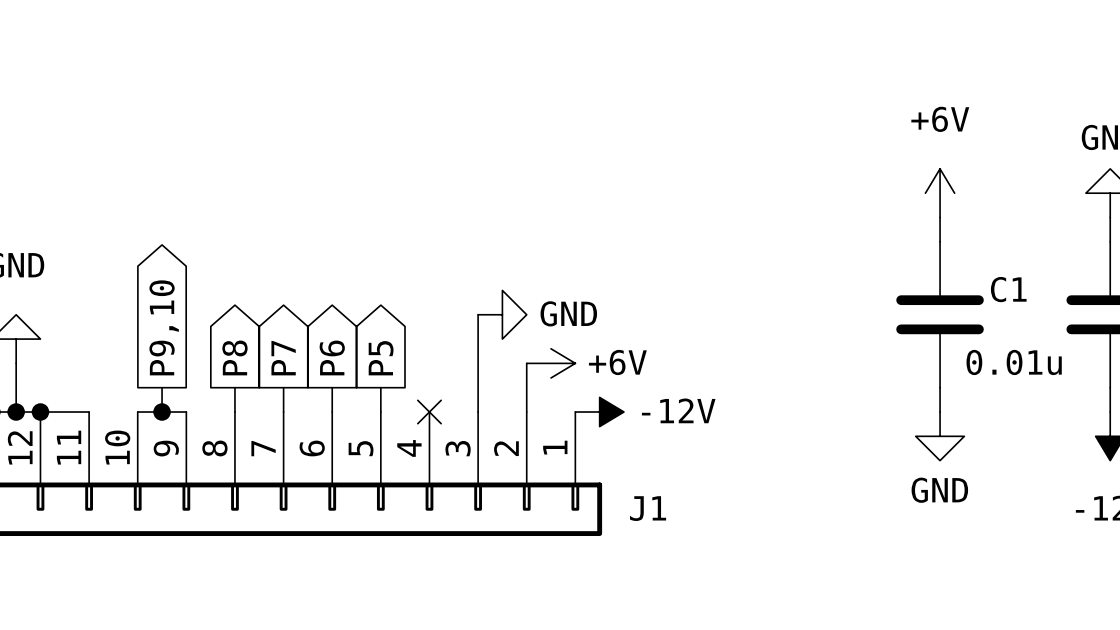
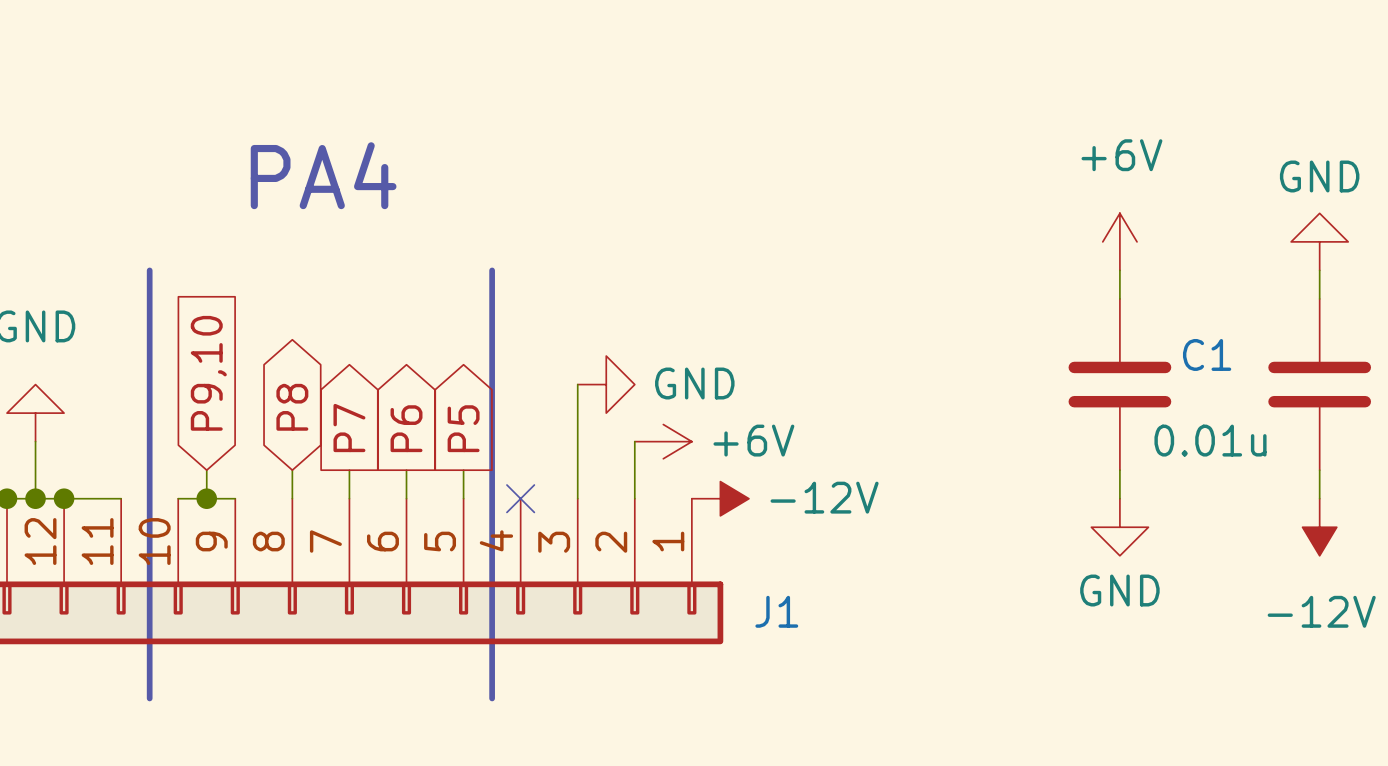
text: none -> PA4 (323, 175)
line: none -> (149, 270) (149, 698)
line: none -> (492, 270) (492, 698)
global label shape: output (164, 327) -> input (208, 373)
global label shape: output (234, 357) -> bidirectional (292, 407)

